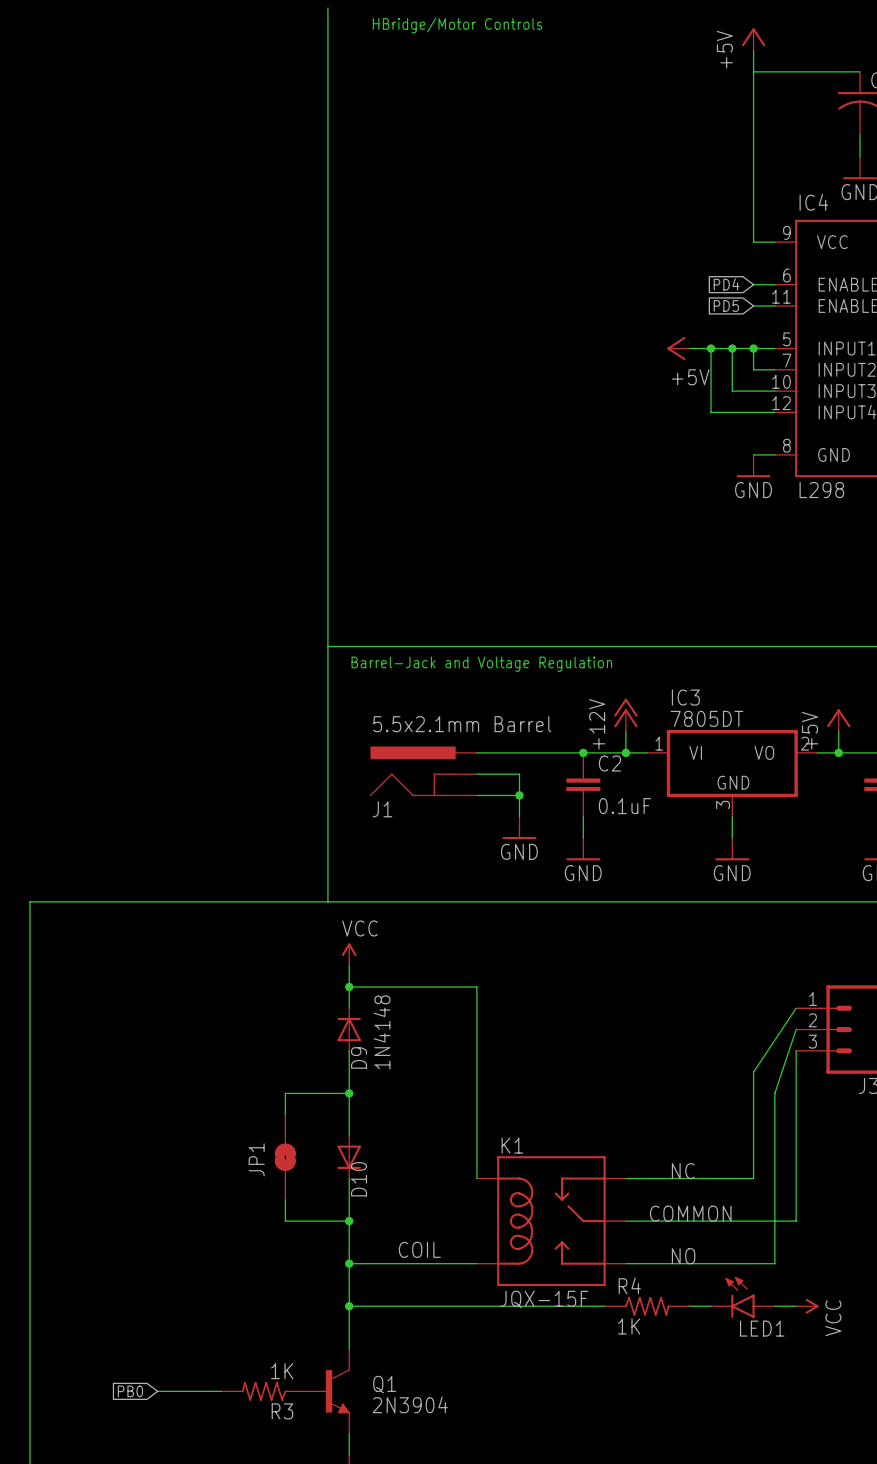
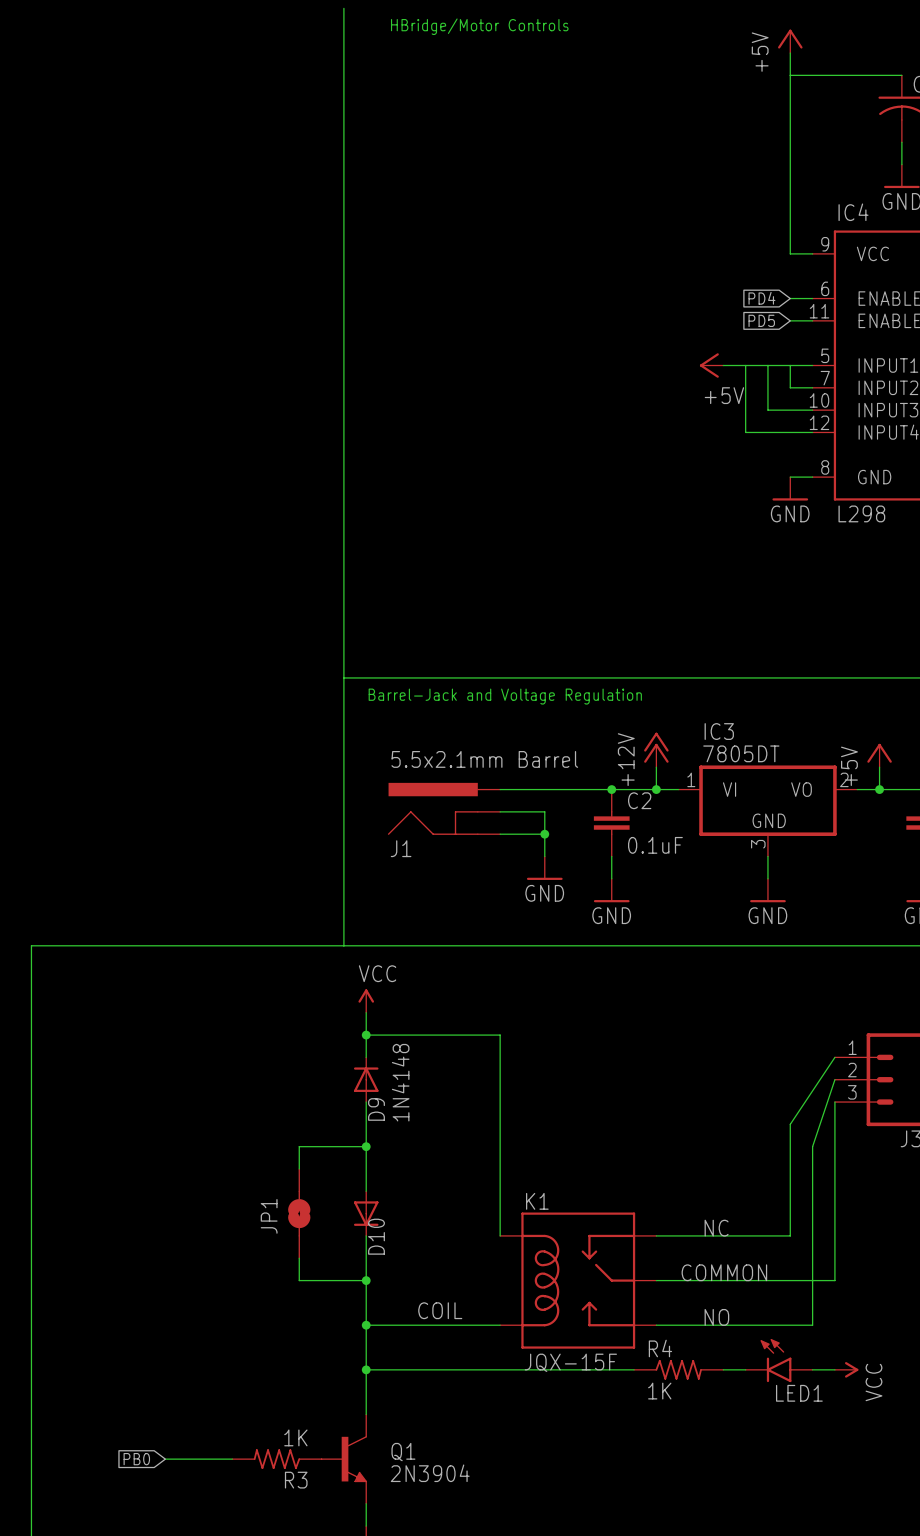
junction: (711, 348) -> none
junction: (732, 348) -> none
junction: (753, 348) -> none

